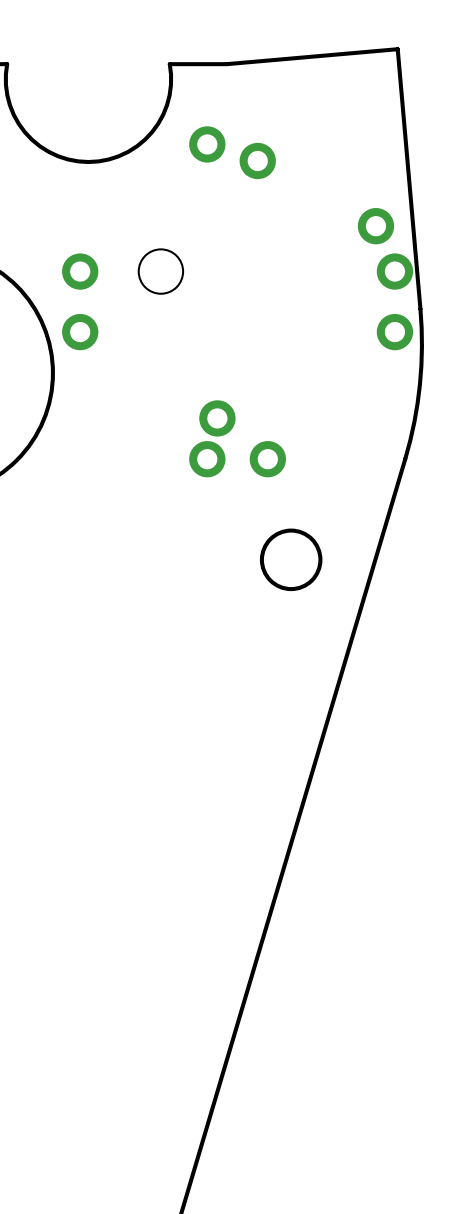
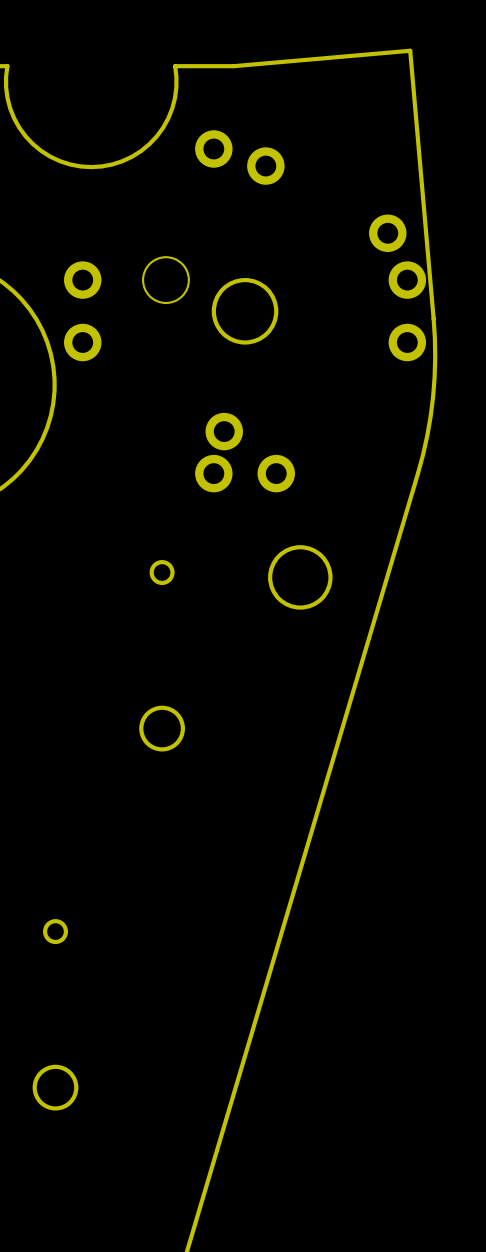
round board edge: none -> [211, 278, 279, 345]
round board edge: none -> [149, 560, 175, 586]
round board edge: none -> [139, 705, 185, 752]
round board edge: none -> [43, 919, 68, 945]
round board edge: none -> [32, 1064, 79, 1111]

